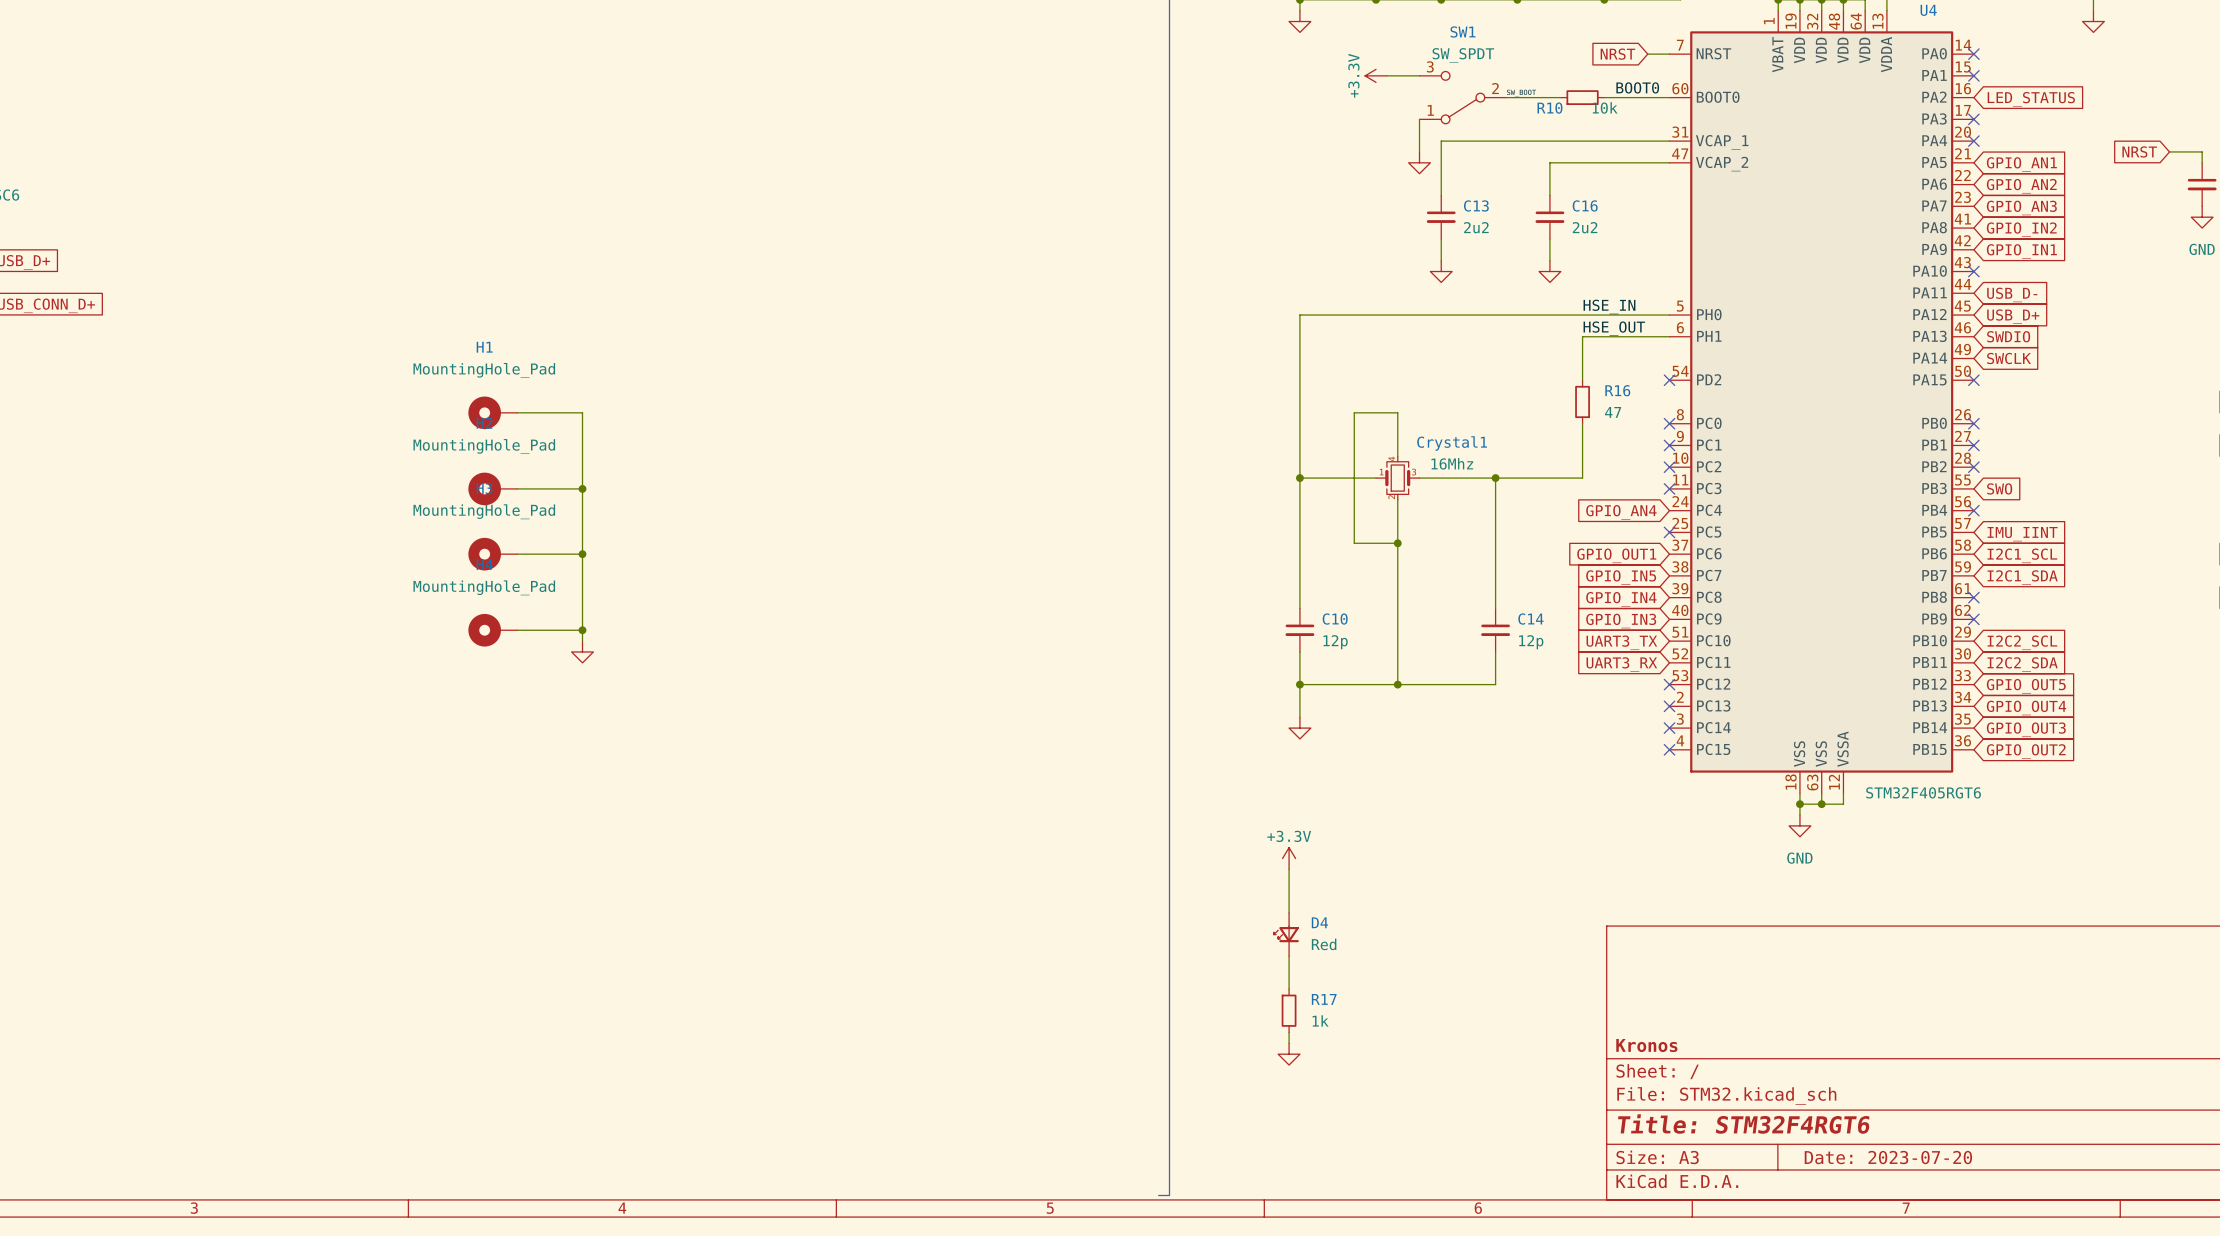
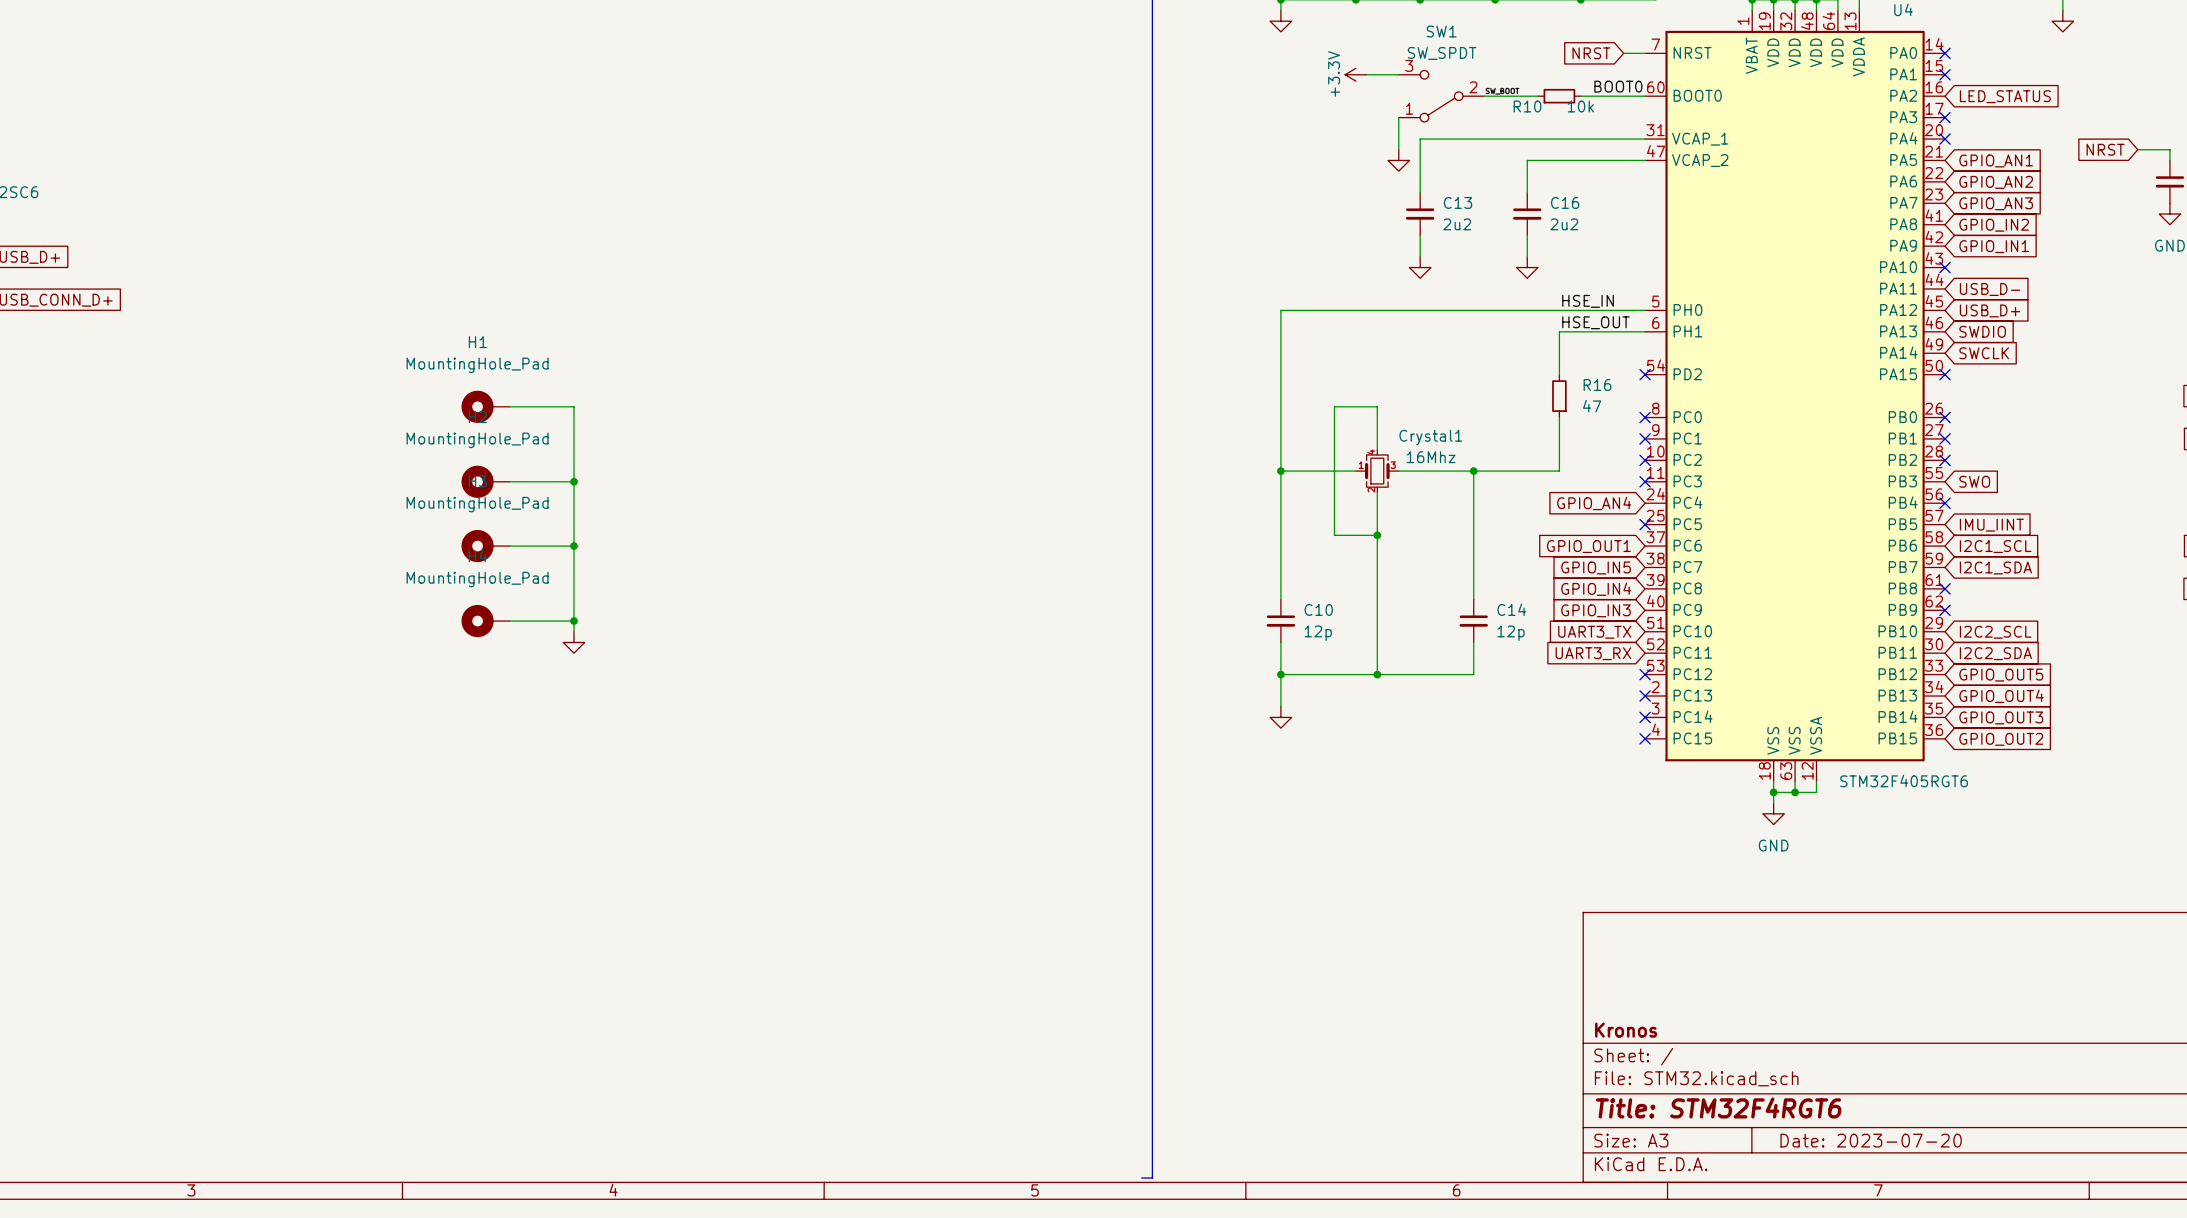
power symbol: +3.3V (1289, 858) -> none
wire: (1289, 869) (1289, 912) -> none
D4: Red (1286, 934) -> none
wire: (1289, 956) (1289, 988) -> none
R17: 1k (1289, 1010) -> none
wire: (1289, 1032) (1289, 1043) -> none
power symbol: (1289, 1054) -> none

